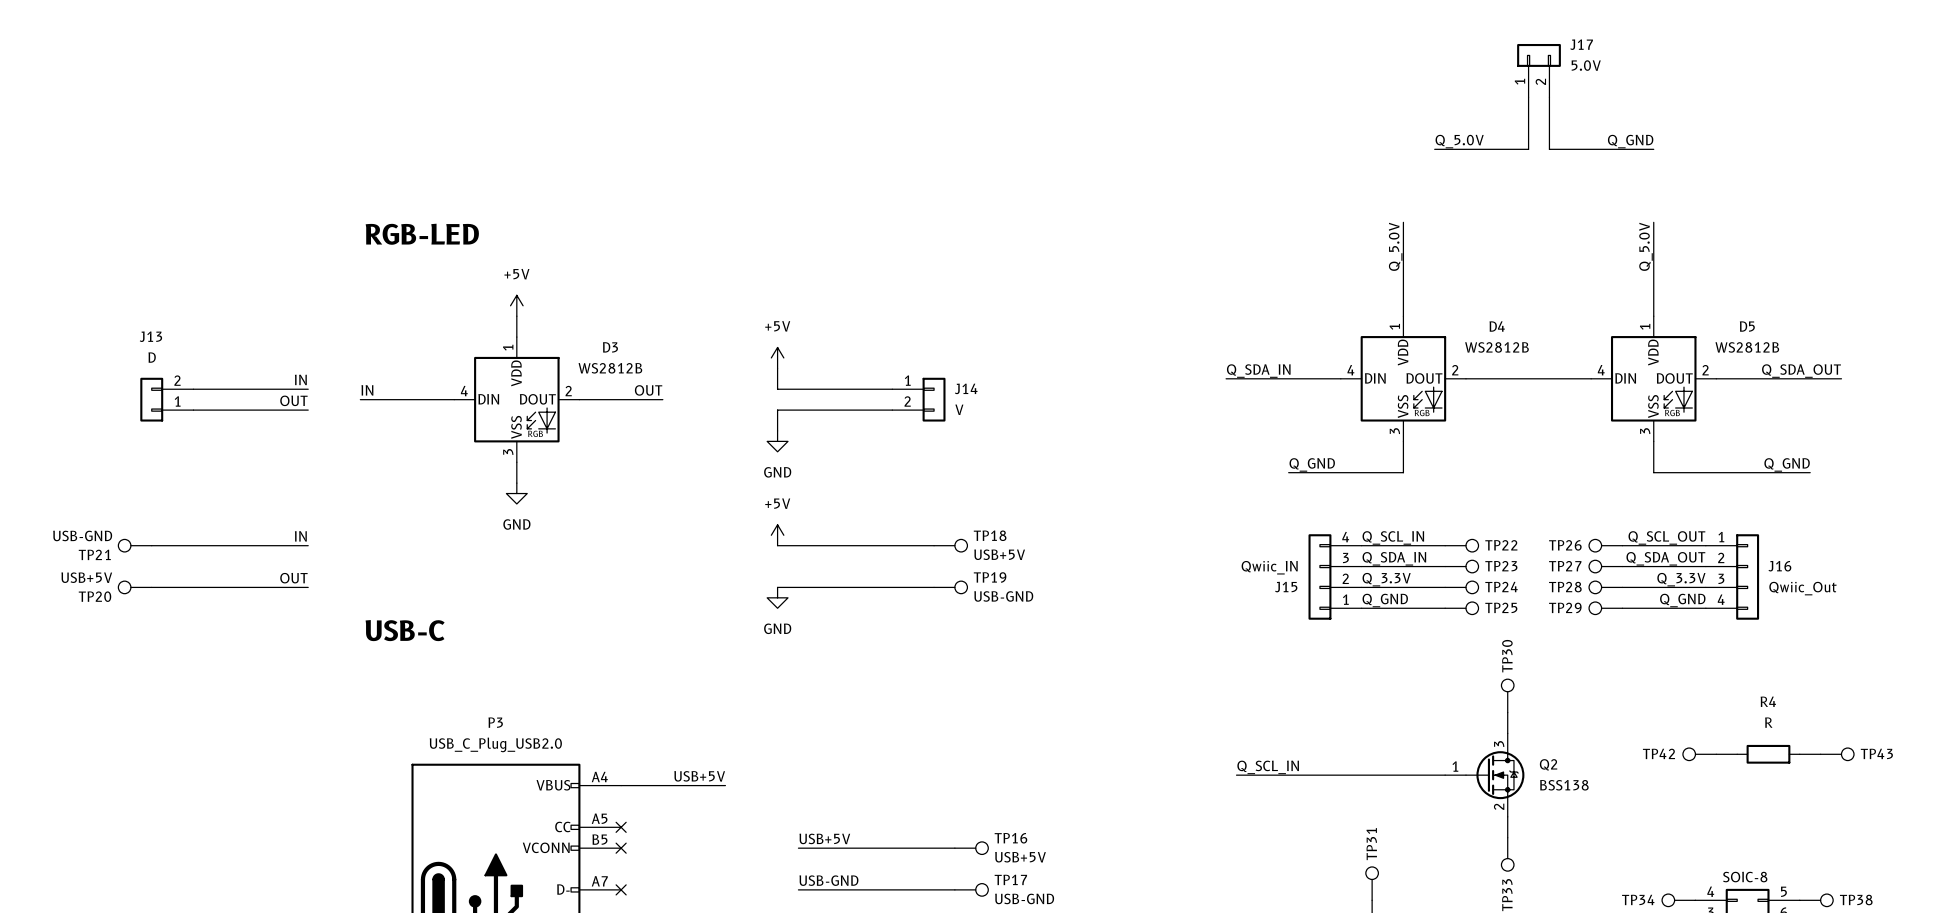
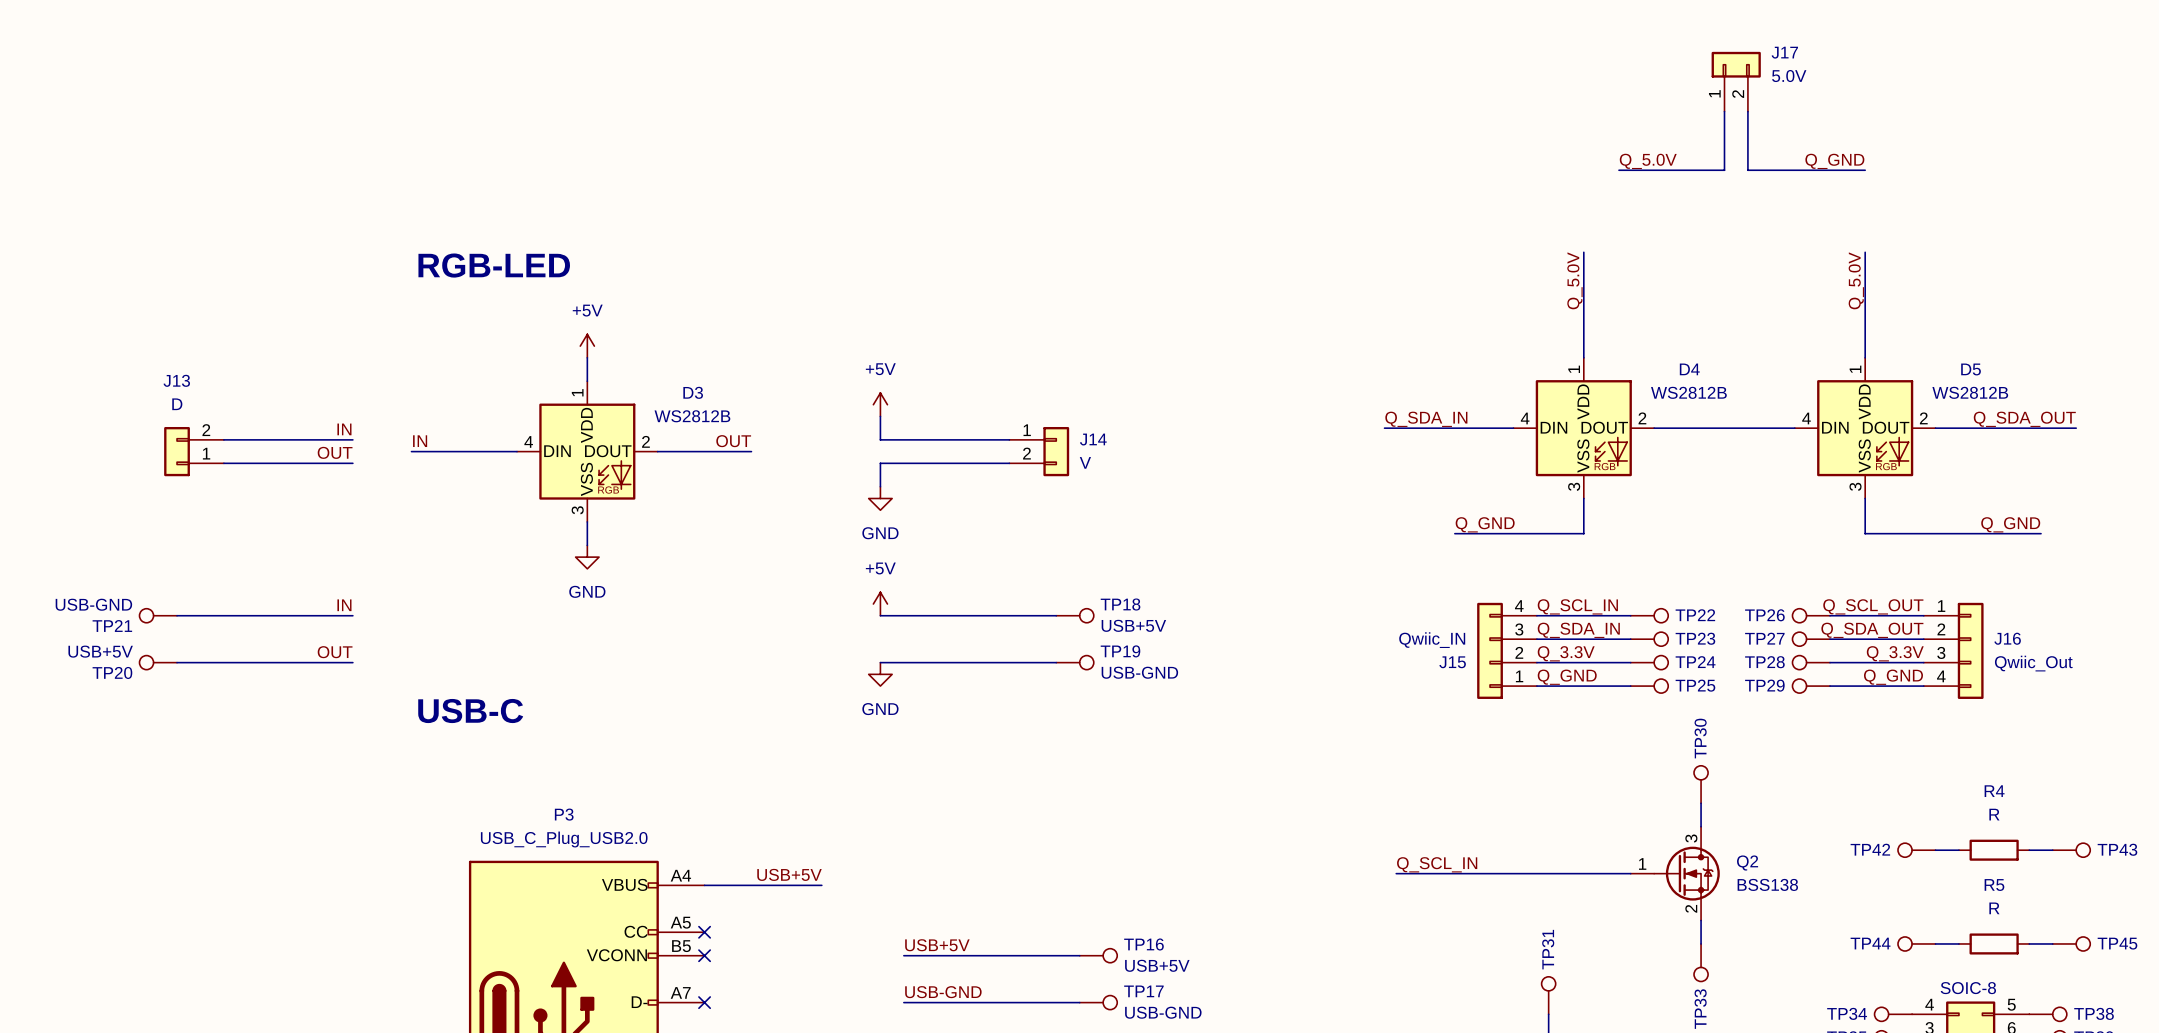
TP44: none -> (1916, 943)
wire: none -> (1935, 943) (1958, 943)
R5: none -> R (1994, 943)
wire: none -> (2029, 943) (2052, 943)
TP45: none -> (2071, 943)

